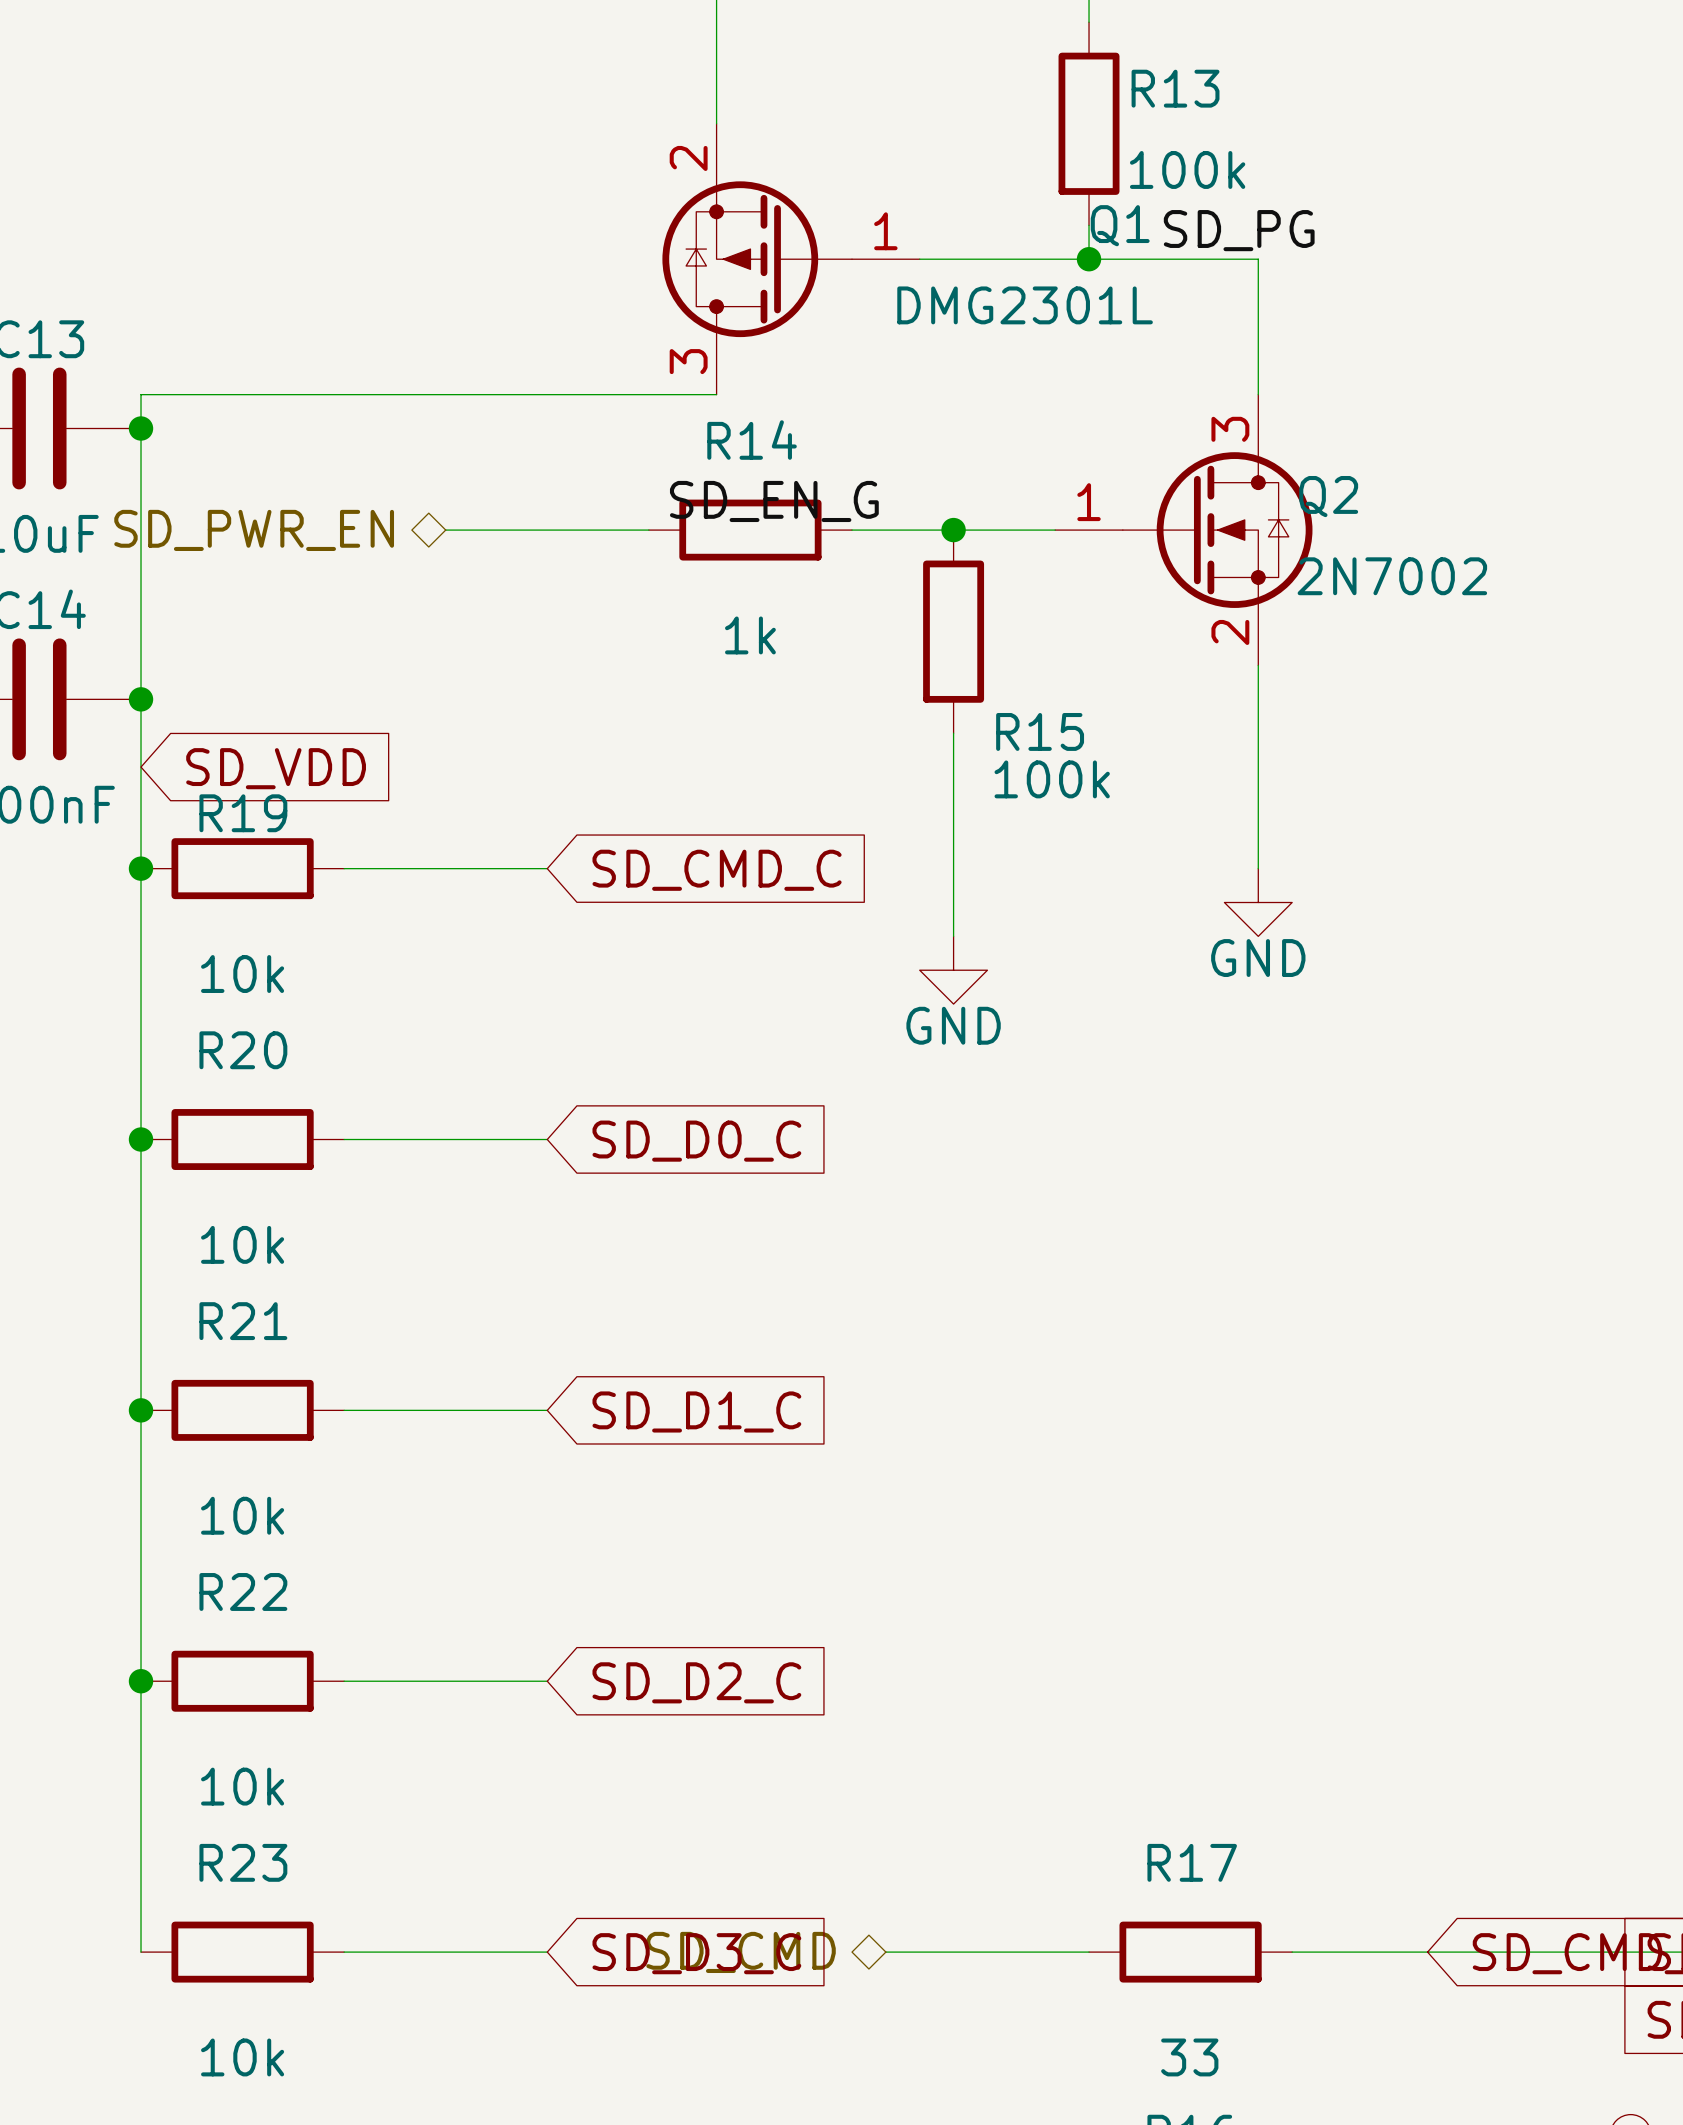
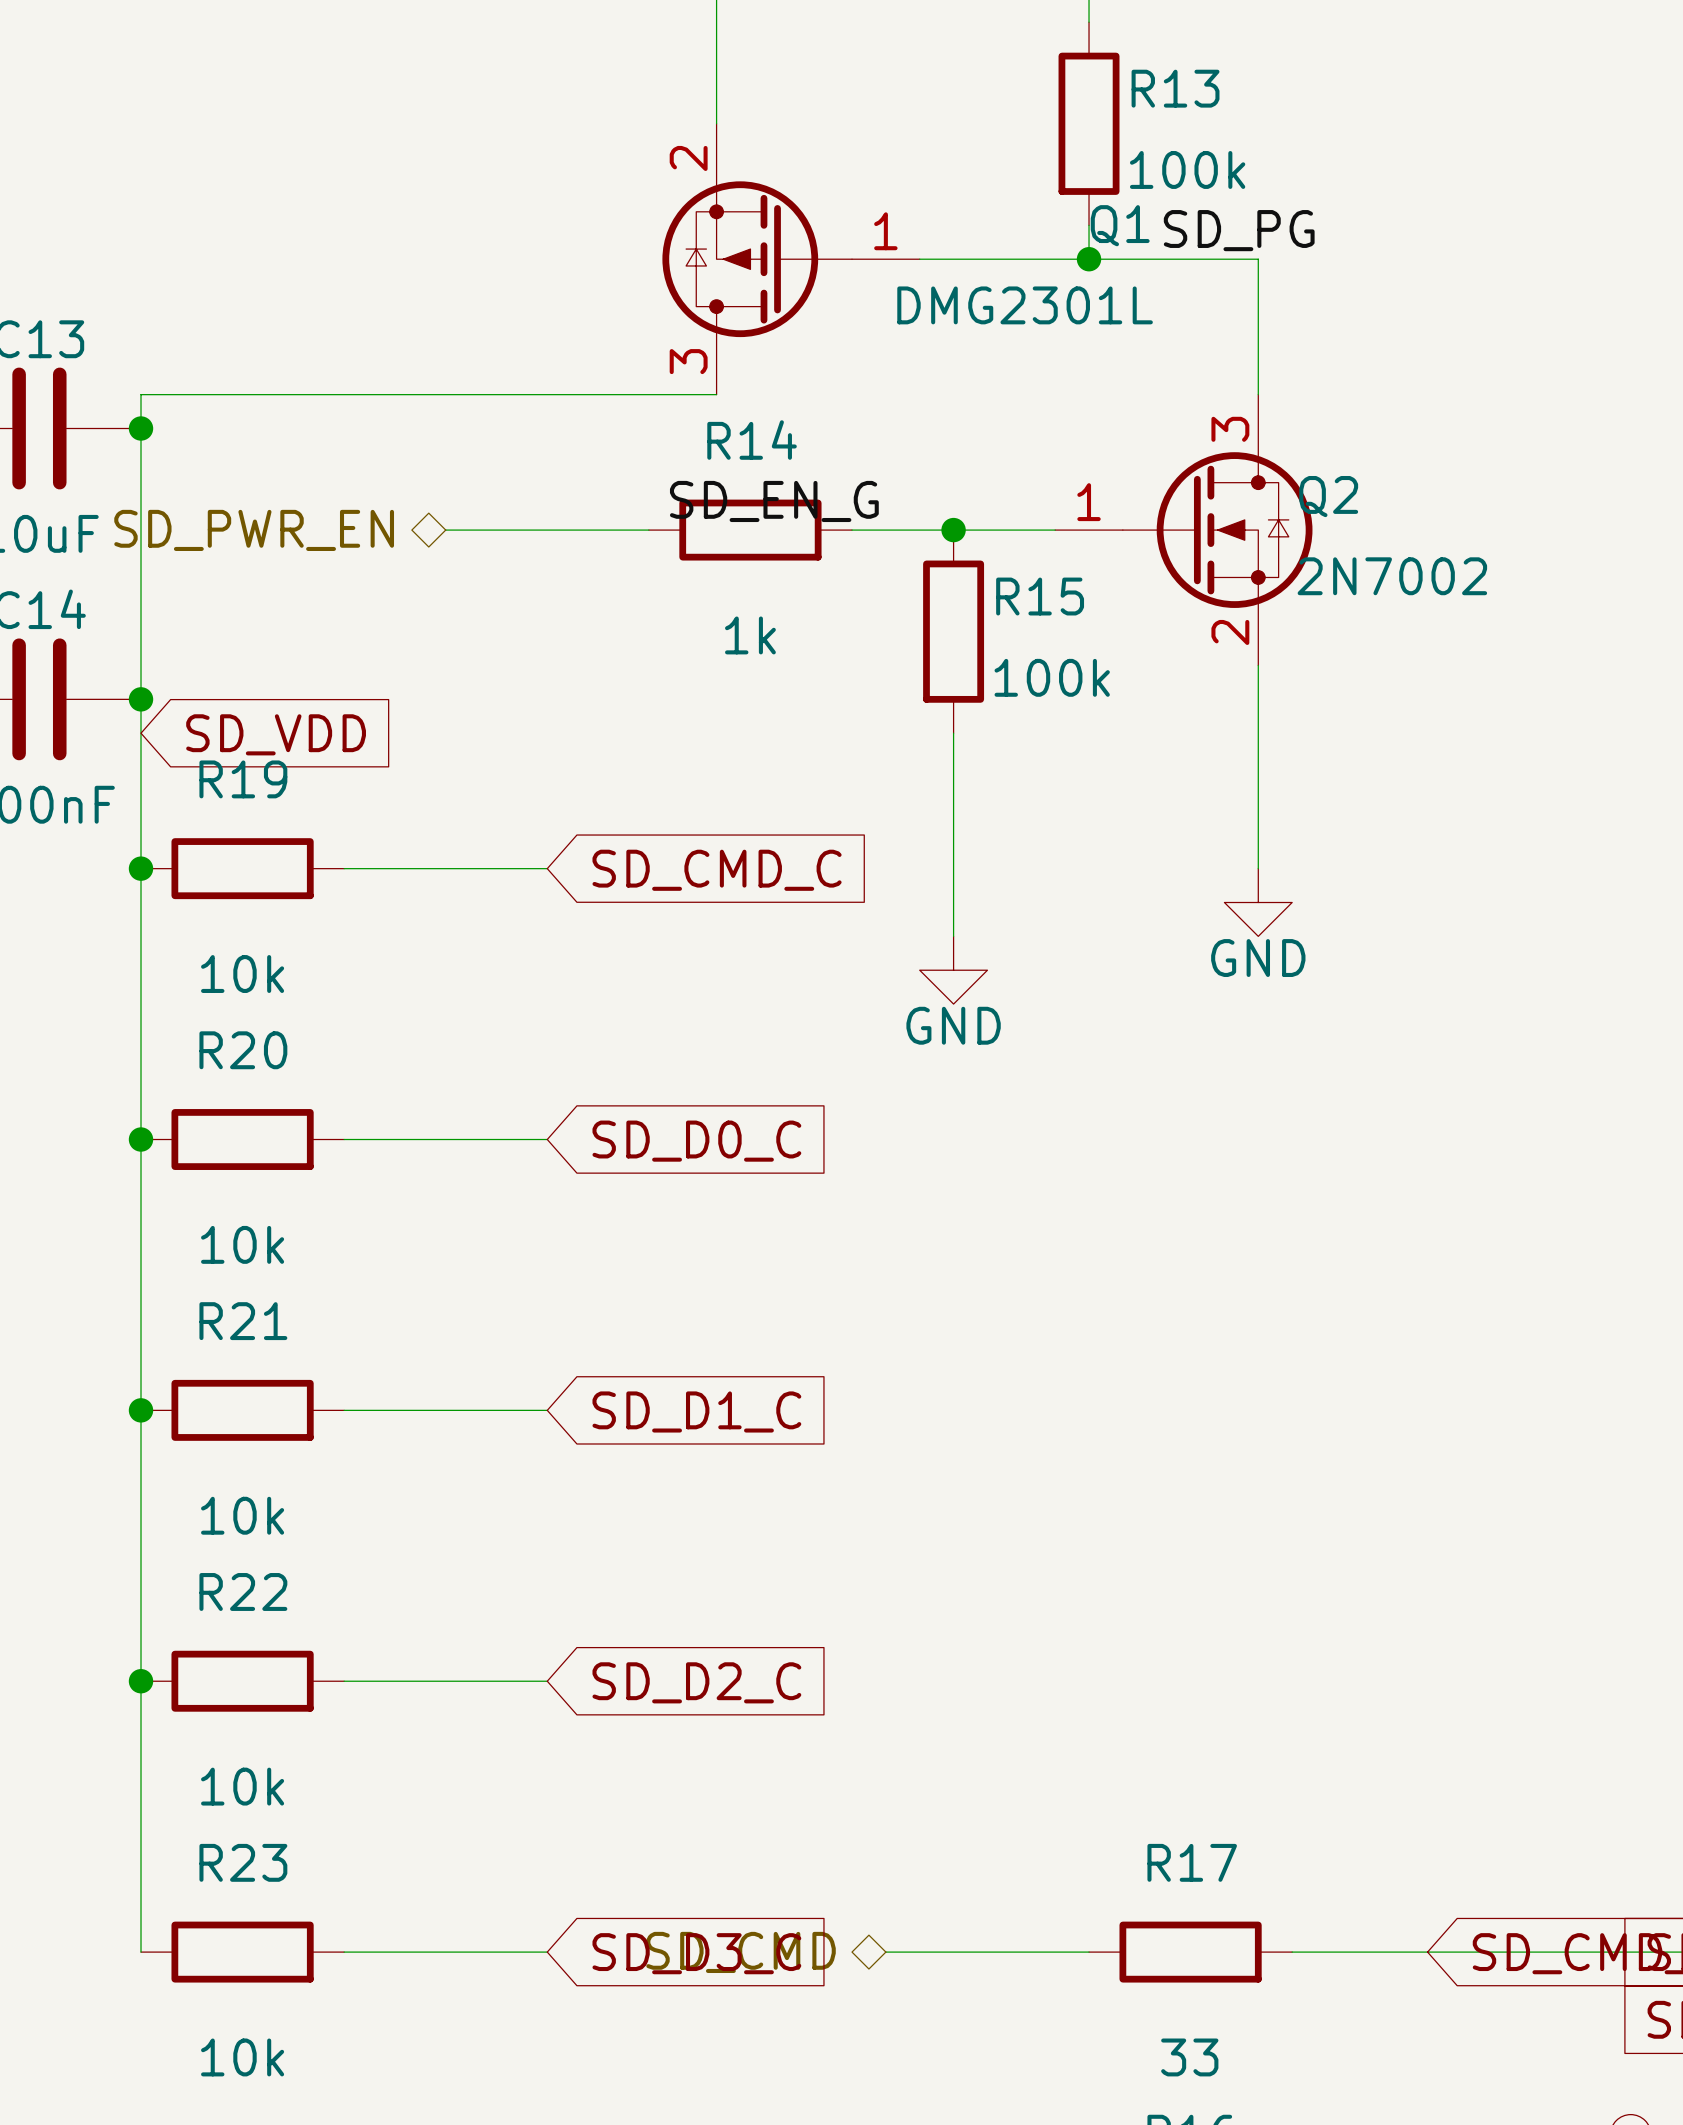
R15 name position: R15 (1040, 731) -> R15 (1040, 596)
global label position: SD_VDD (276, 768) -> SD_VDD (276, 734)
R15 value position: 100k (1052, 779) -> 100k (1052, 677)
R19 name position: R19 (243, 813) -> R19 (243, 779)

